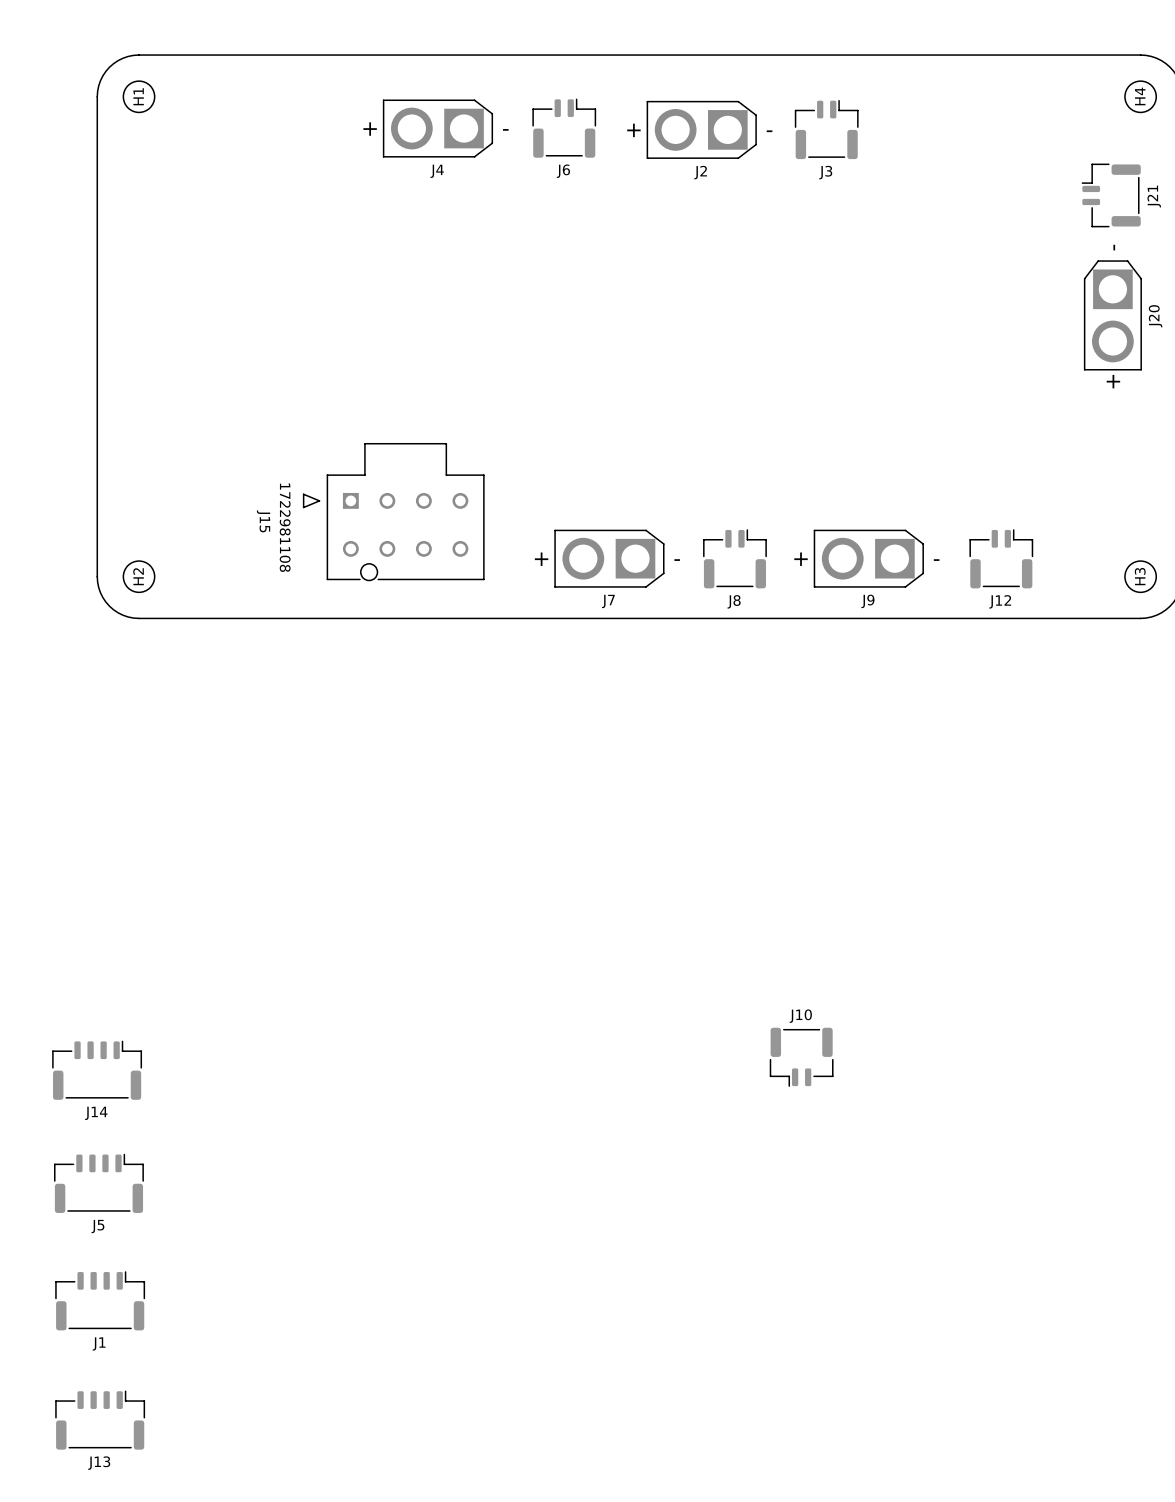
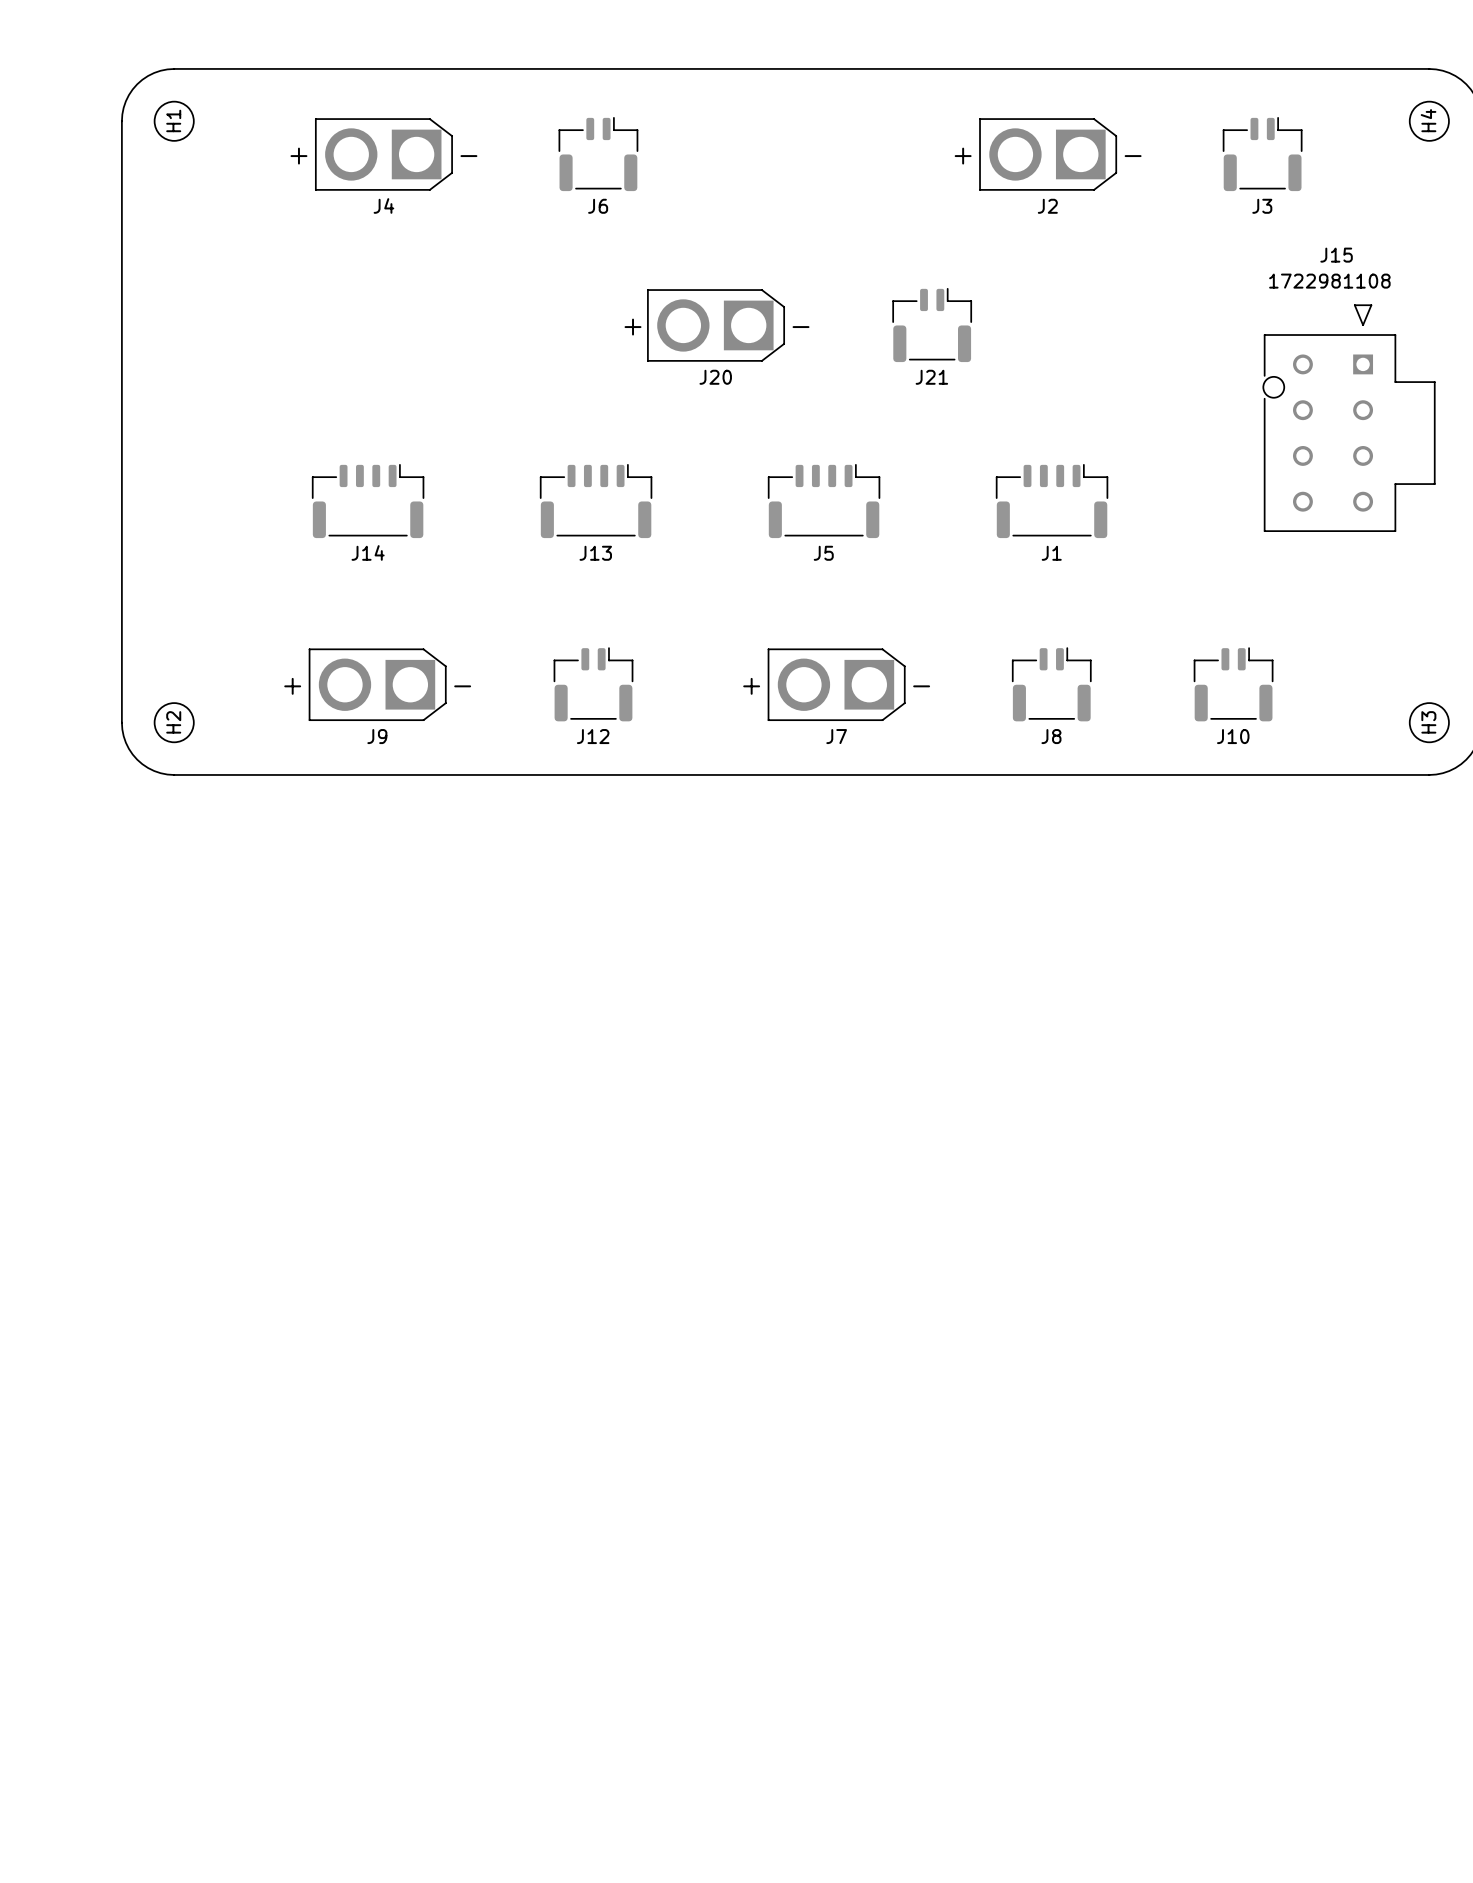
J4 position: (437, 128) -> (383, 154)
J6 position: (564, 128) -> (598, 154)
J2 position: (701, 129) -> (1048, 154)
J3 position: (826, 129) -> (1262, 154)
J21 rotation: 0° (1111, 195) -> 90° clockwise (932, 325)
J21 position: (1111, 195) -> (932, 325)
J20 rotation: 0° (1112, 315) -> 90° clockwise (716, 325)
J20 position: (1112, 315) -> (716, 325)
J15 rotation: 0° (393, 511) -> 90° clockwise (1349, 418)
J15 position: (393, 511) -> (1349, 418)
J7 position: (609, 558) -> (836, 684)
J8 position: (734, 558) -> (1051, 684)
J9 position: (868, 558) -> (377, 684)
J12 position: (1001, 558) -> (593, 684)
J10 rotation: 0° (801, 1057) -> 180° (1233, 684)
J10 position: (801, 1057) -> (1233, 684)
J14 position: (97, 1070) -> (368, 501)
J5 position: (98, 1183) -> (824, 501)
J1 position: (100, 1300) -> (1052, 501)
J13 position: (100, 1420) -> (596, 501)

